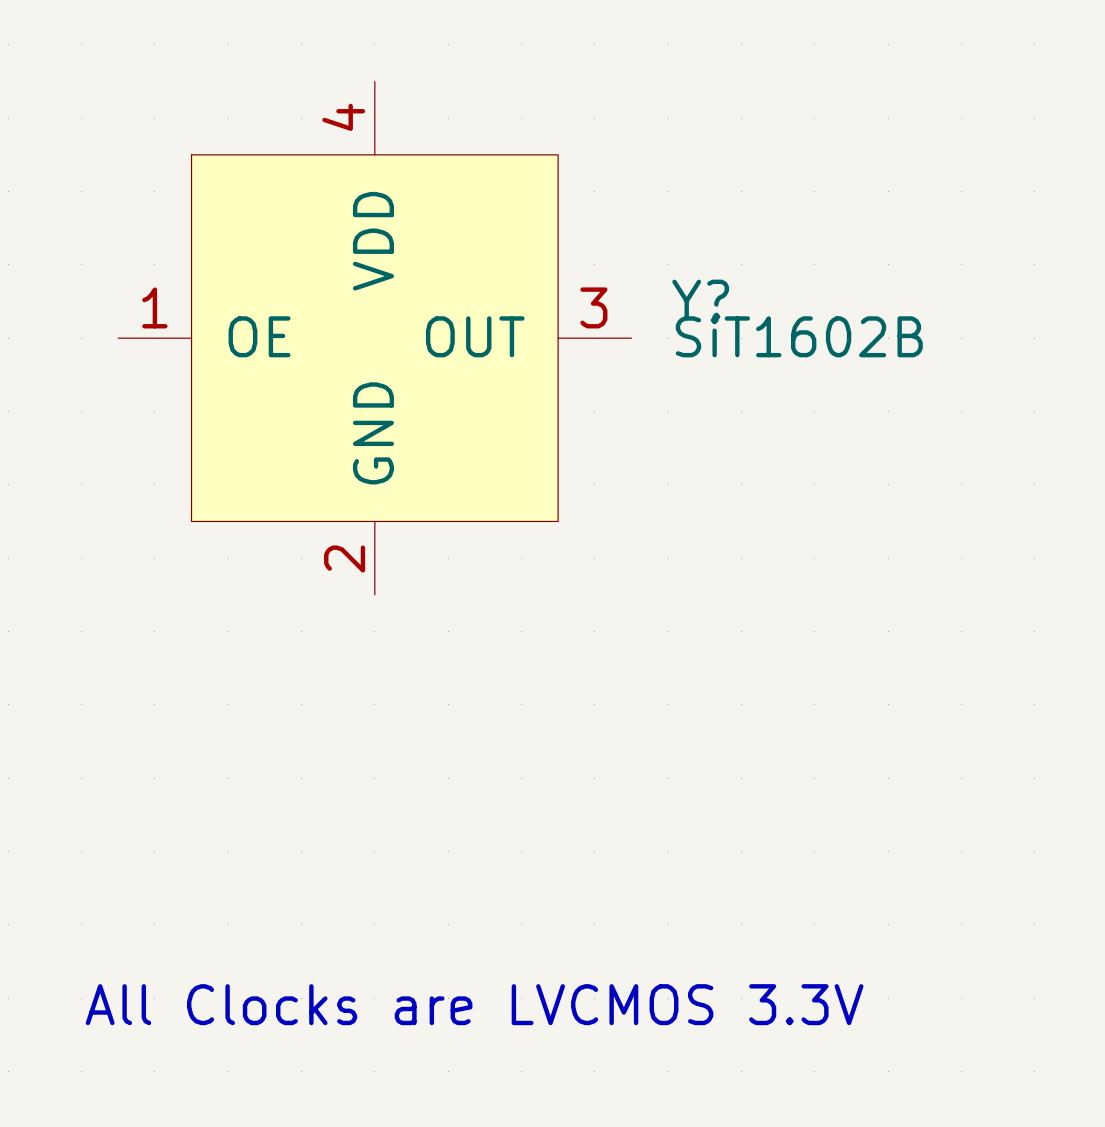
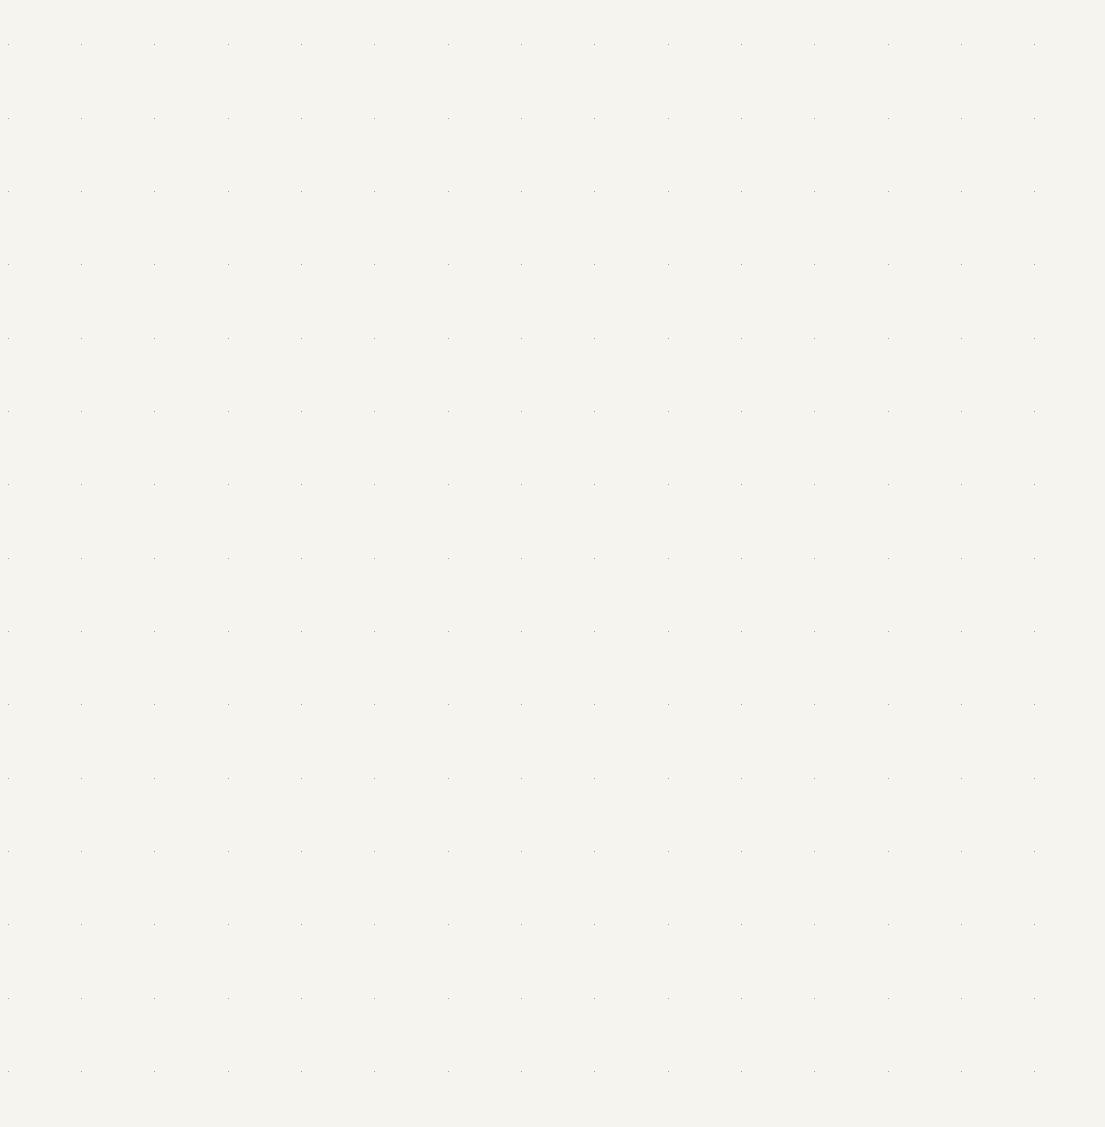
Y?: SiT1602B (374, 338) -> none
text: All Clocks are LVCMOS 3.3V (474, 1004) -> none

